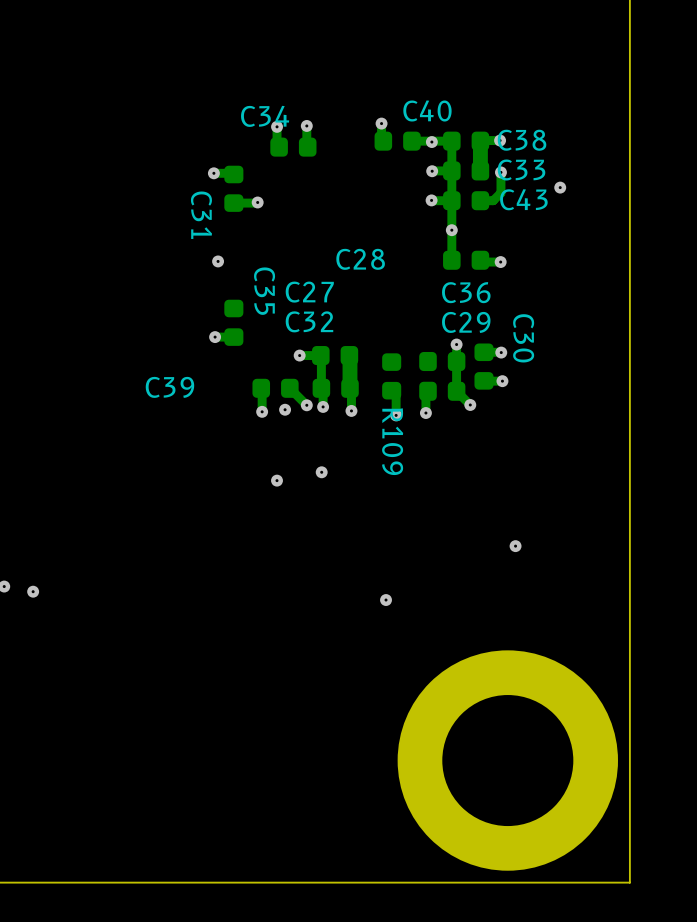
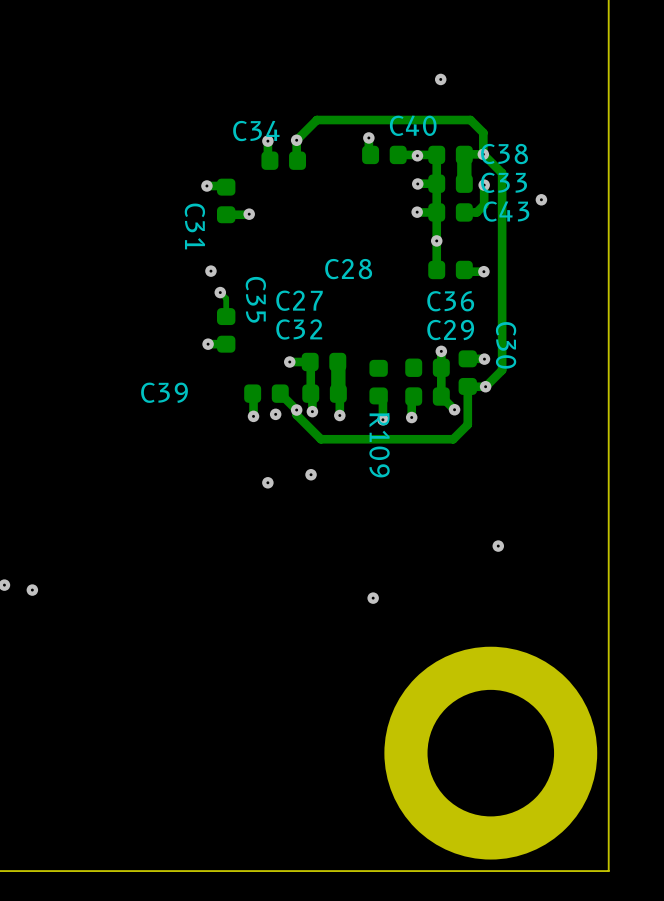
via: none -> (440, 79)
track: none -> (296, 140) (316, 120) (470, 120) (483, 132) (483, 154) (502, 173) (502, 370) (485, 386)
track: none -> (220, 292) (226, 298) (226, 316)
via: none -> (220, 292)
track: none -> (467, 386) (467, 424) (453, 439) (320, 439) (296, 414) (296, 410)

